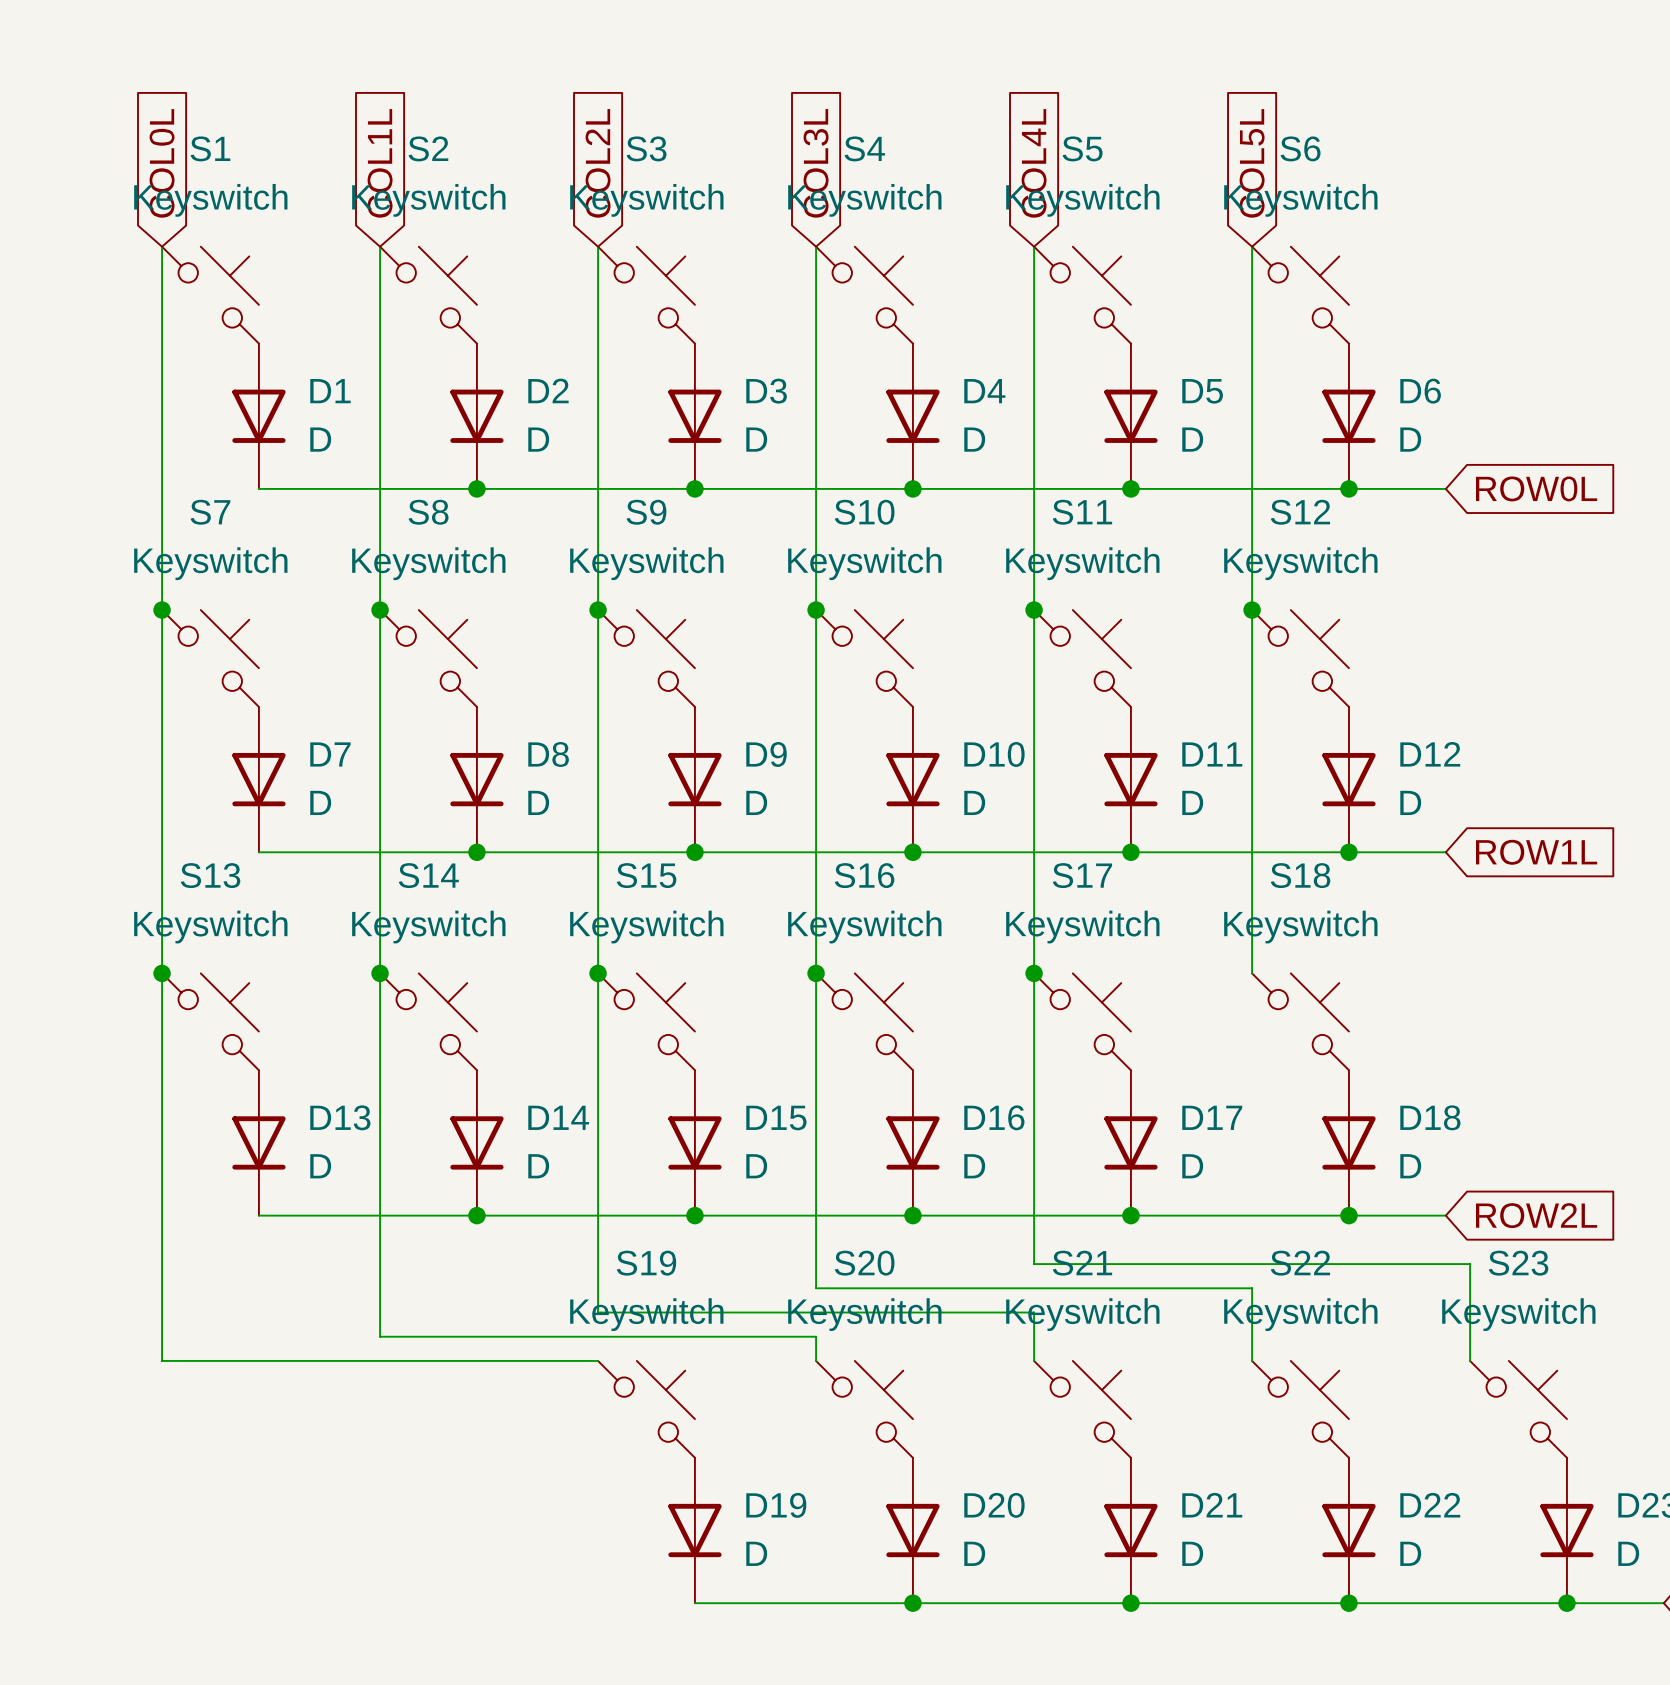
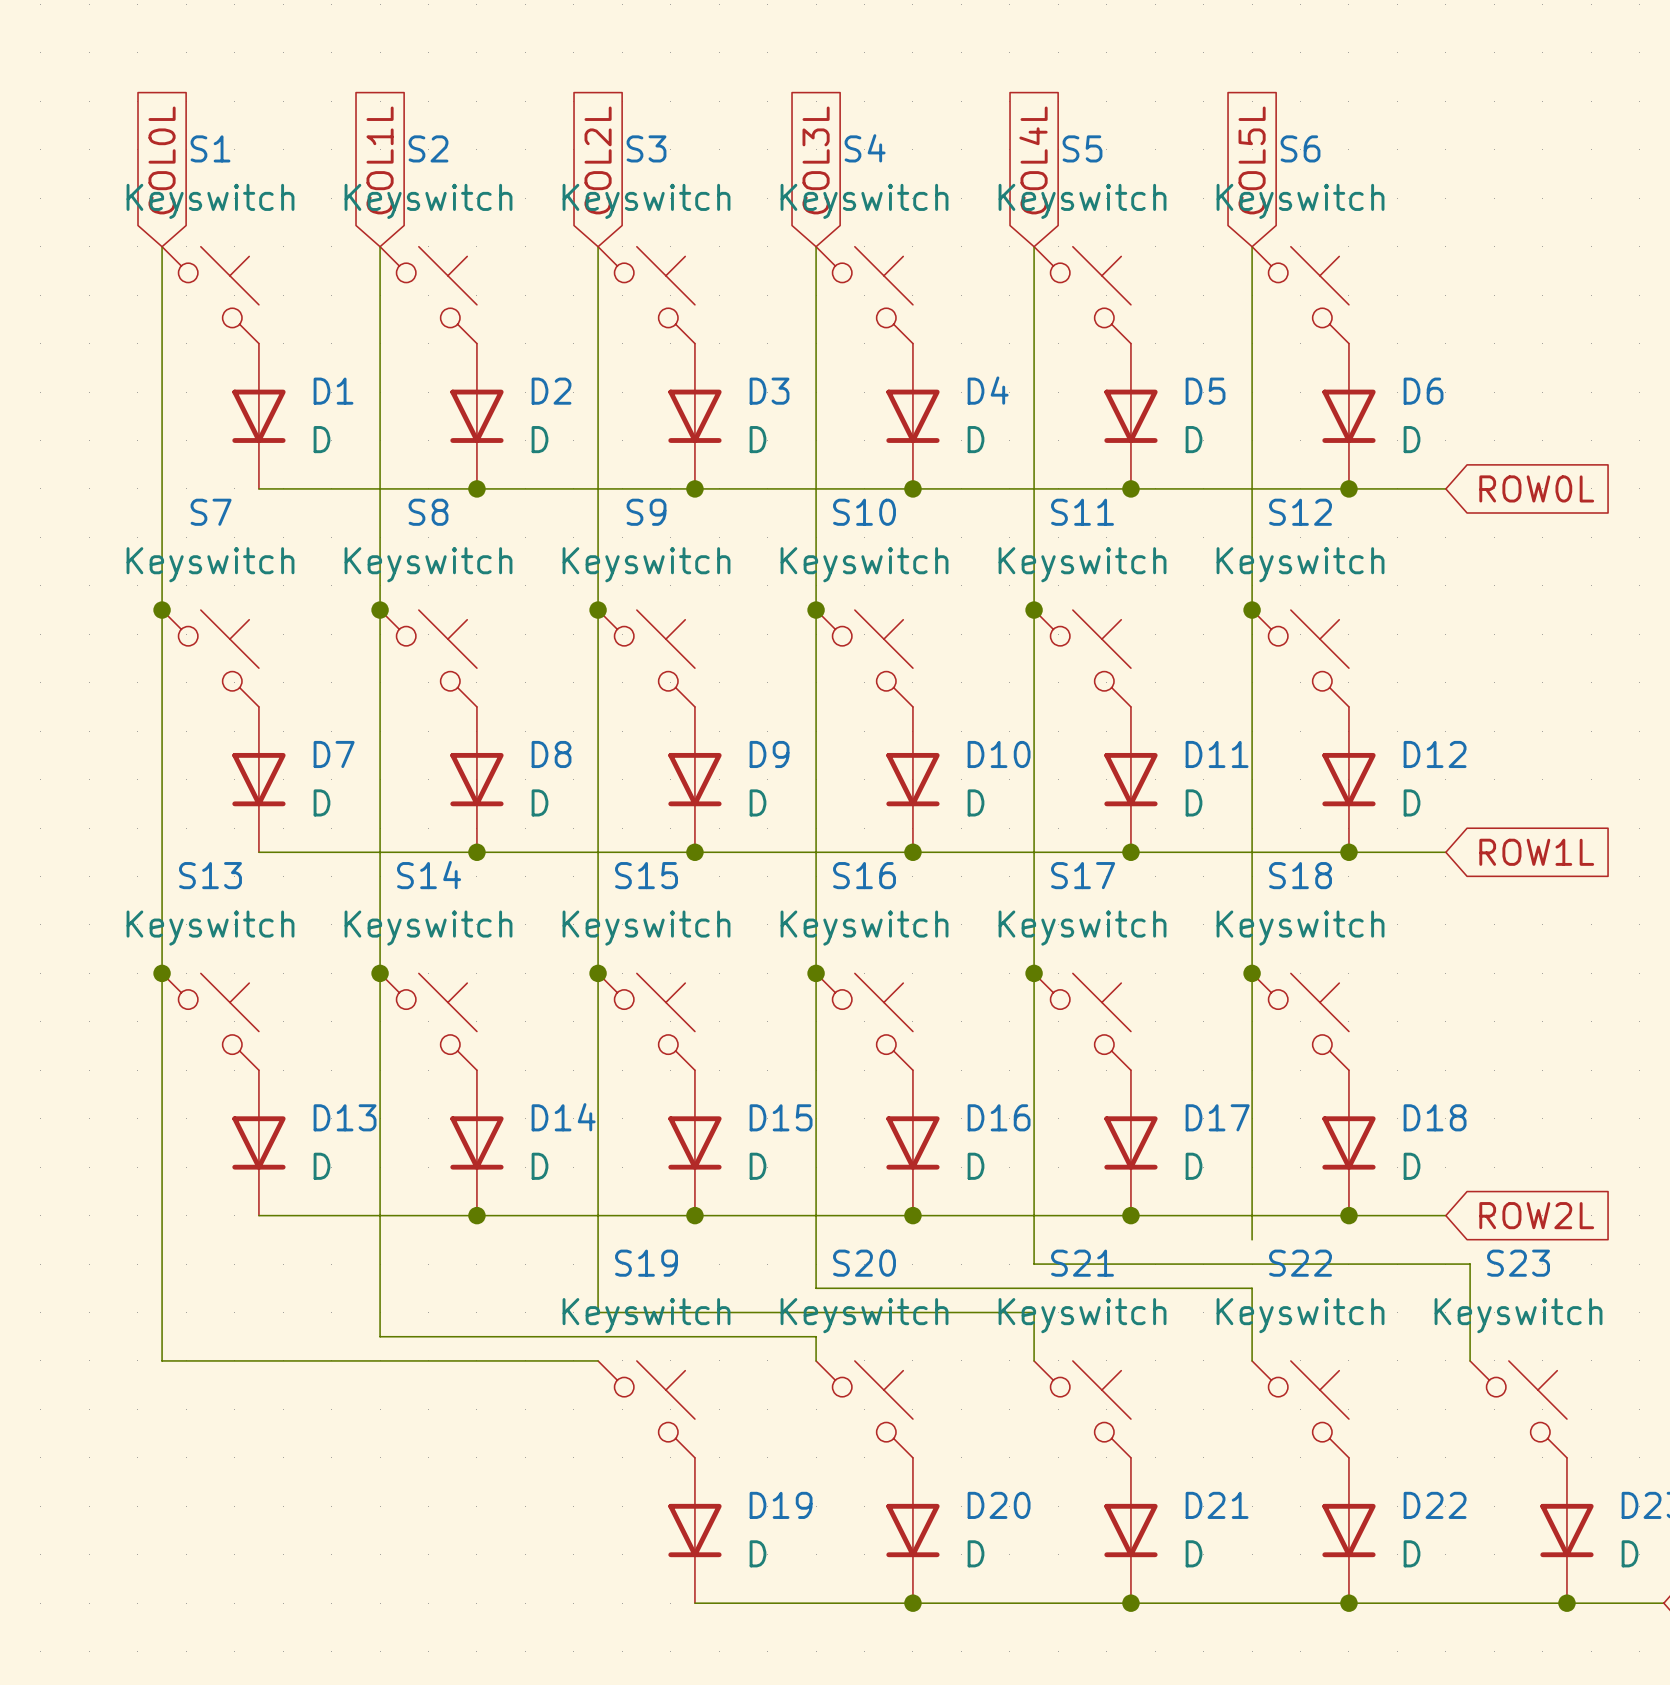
wire: none -> (1252, 973) (1252, 1239)
junction: none -> (1252, 973)

